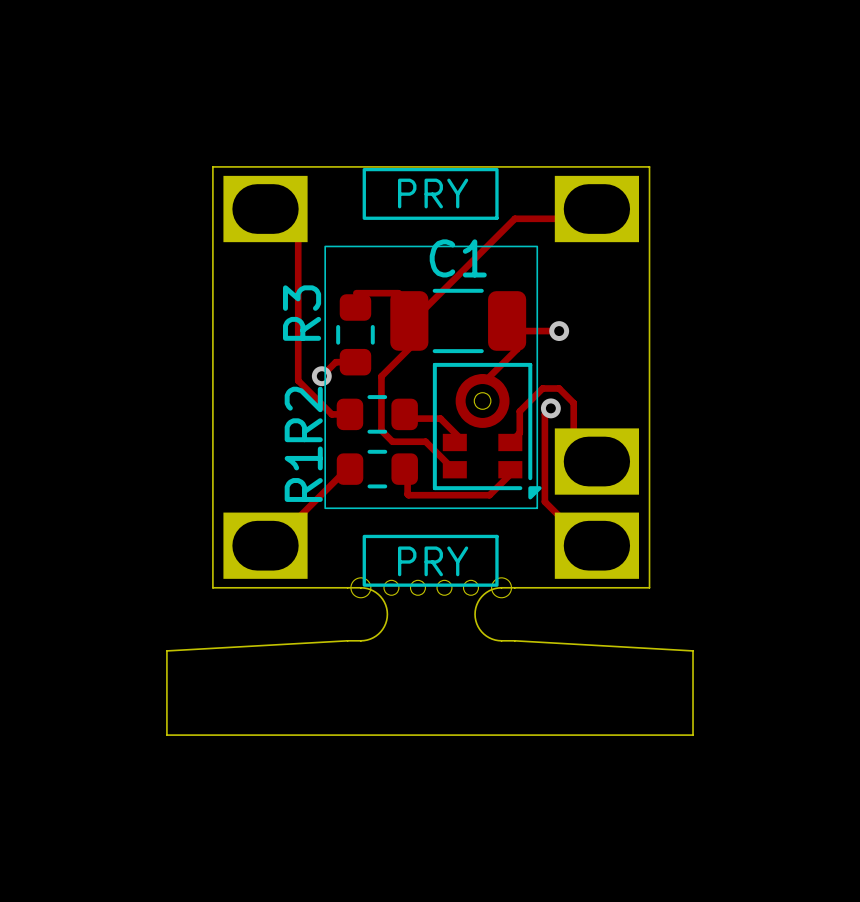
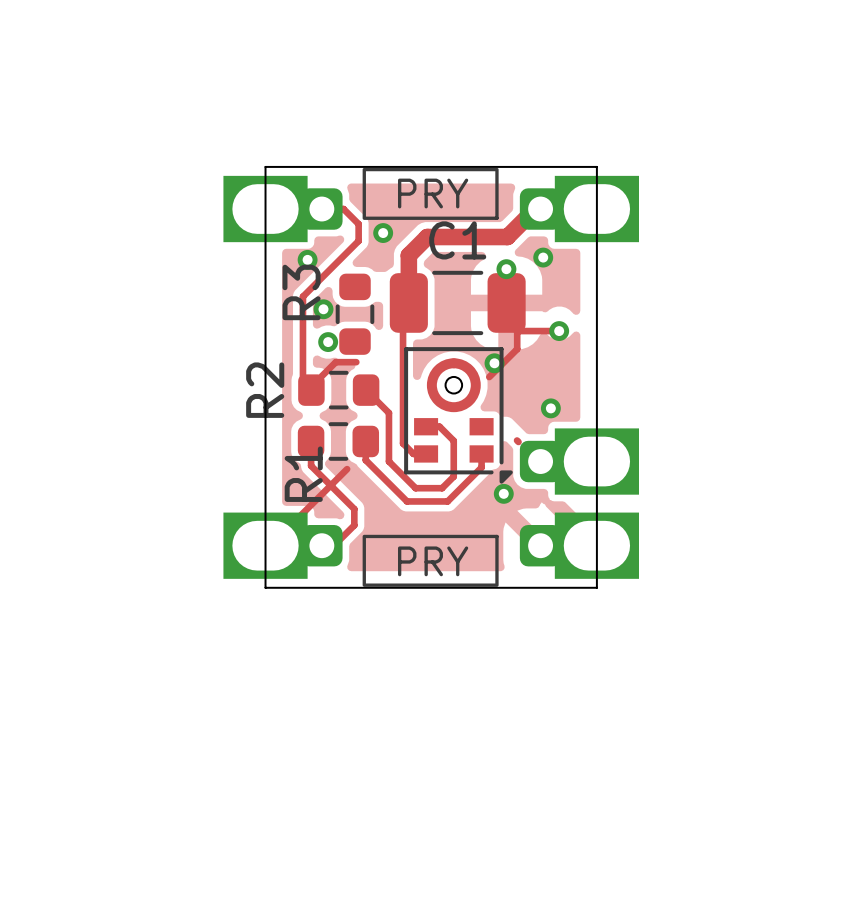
track: none -> (321, 209) (343, 209) (358, 224) (358, 240) (302, 296) (302, 381) (311, 390)
track: none -> (540, 209) (535, 209) (507, 237) (427, 237) (408, 255) (408, 302) (403, 308) (403, 443) (413, 453) (426, 453)
track: (261, 218) (281, 218) (298, 235) (298, 380) (331, 414) (349, 414) -> none
track: (598, 218) (514, 218) (419, 314) -> none
via: none -> (383, 233)
via: none -> (543, 257)
via: none -> (307, 259)
via: none -> (506, 269)
track: (356, 293) (398, 293) (419, 314) -> none
via: none -> (323, 309)
track: (419, 314) (419, 338) (381, 376) (381, 430) (392, 441) (425, 441) (451, 467) (461, 467) -> none
C1 position: (458, 320) -> (457, 302)
R3 position: (355, 334) -> (354, 314)
via: none -> (328, 342)
via: none -> (494, 363)
via: (321, 376) -> none
part: none -> (431, 377)
track: none -> (366, 390) (388, 412) (388, 461) (415, 488) (442, 488) (453, 476) (453, 440) (439, 426) (426, 426)
part: (431, 403) -> none
track: (550, 408) (544, 414) (544, 501) (598, 555) -> none
R2 position: (377, 414) -> (338, 390)
track: (404, 418) (440, 418) (461, 440) -> none
part position: (487, 431) -> (458, 415)
track: none -> (311, 441) (311, 465) (354, 509) (354, 525) (333, 545) (321, 545)
track: none -> (365, 441) (365, 460) (407, 501) (447, 501) (481, 467) (481, 453)
track: (510, 442) (519, 433) (519, 411) (542, 388) (559, 388) (573, 403) (573, 438) (596, 461) -> none
track: (517, 467) (489, 495) (408, 495) (407, 469) -> none
R1 position: (377, 469) -> (338, 441)
via: none -> (503, 493)
board edge: (347, 640) (166, 650) (166, 735) (693, 735) (693, 650) (514, 640) -> none

